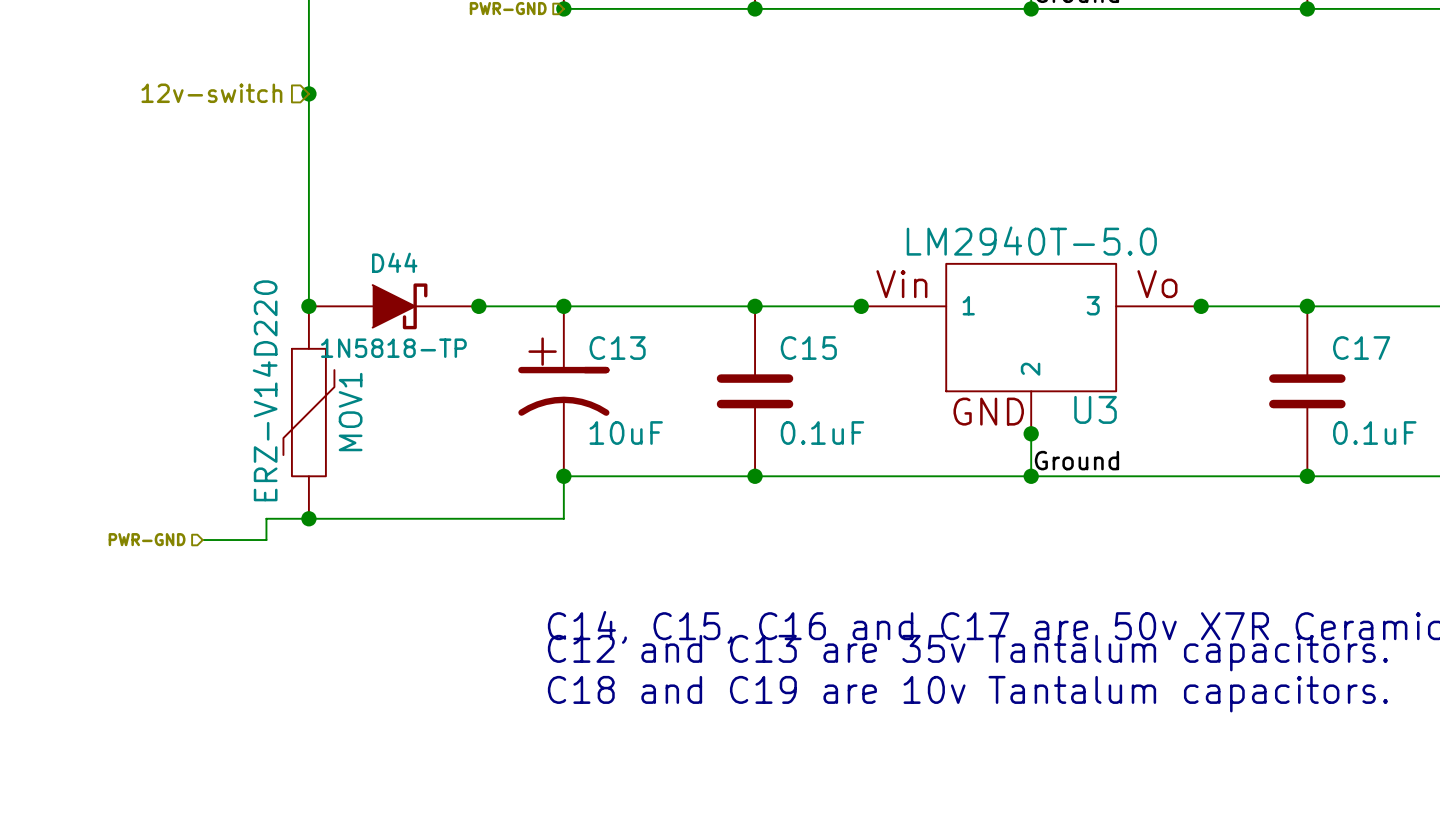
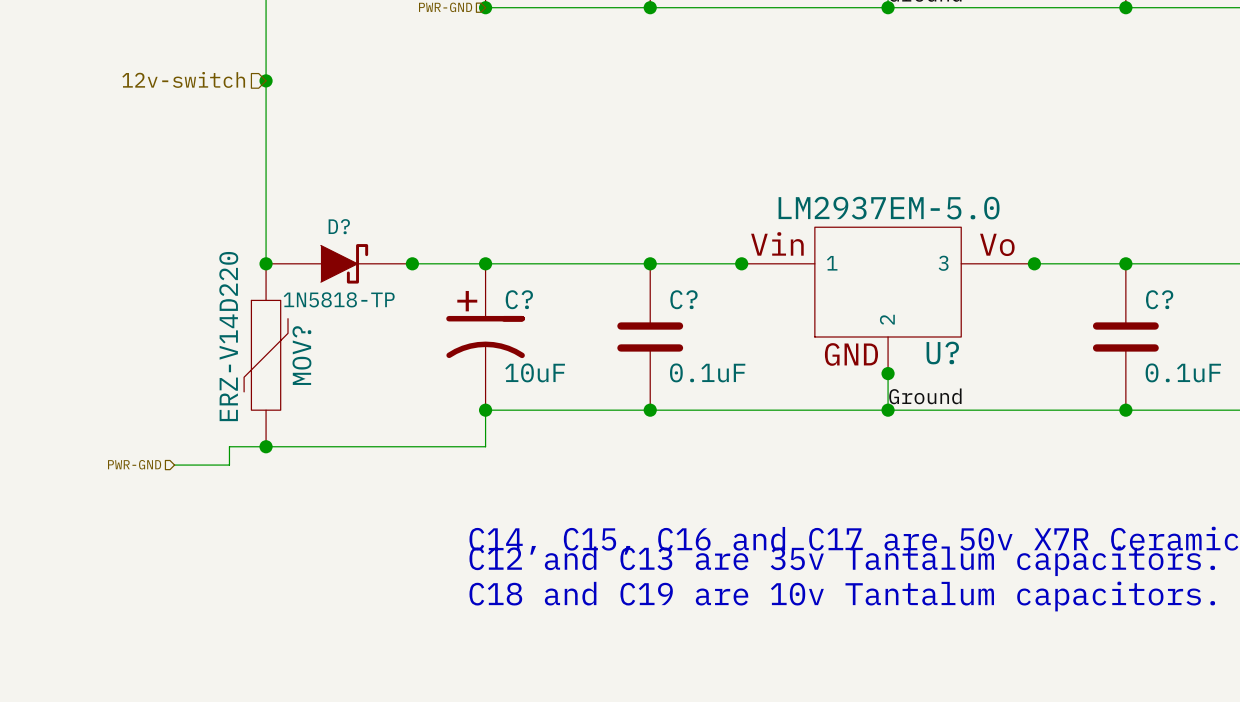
U3 value: LM2940T-5.0 (1031, 241) -> LM2937EM-5.0 (889, 208)
D44 name: D44 (394, 262) -> D? (339, 226)
C13 name: C13 (617, 348) -> C? (519, 299)
C15 name: C15 (808, 348) -> C? (683, 299)
C17 name: C17 (1361, 348) -> C? (1159, 299)
U3 name: U3 (1095, 409) -> U? (942, 353)
MOV1 name: MOV1 (350, 412) -> MOV? (301, 355)

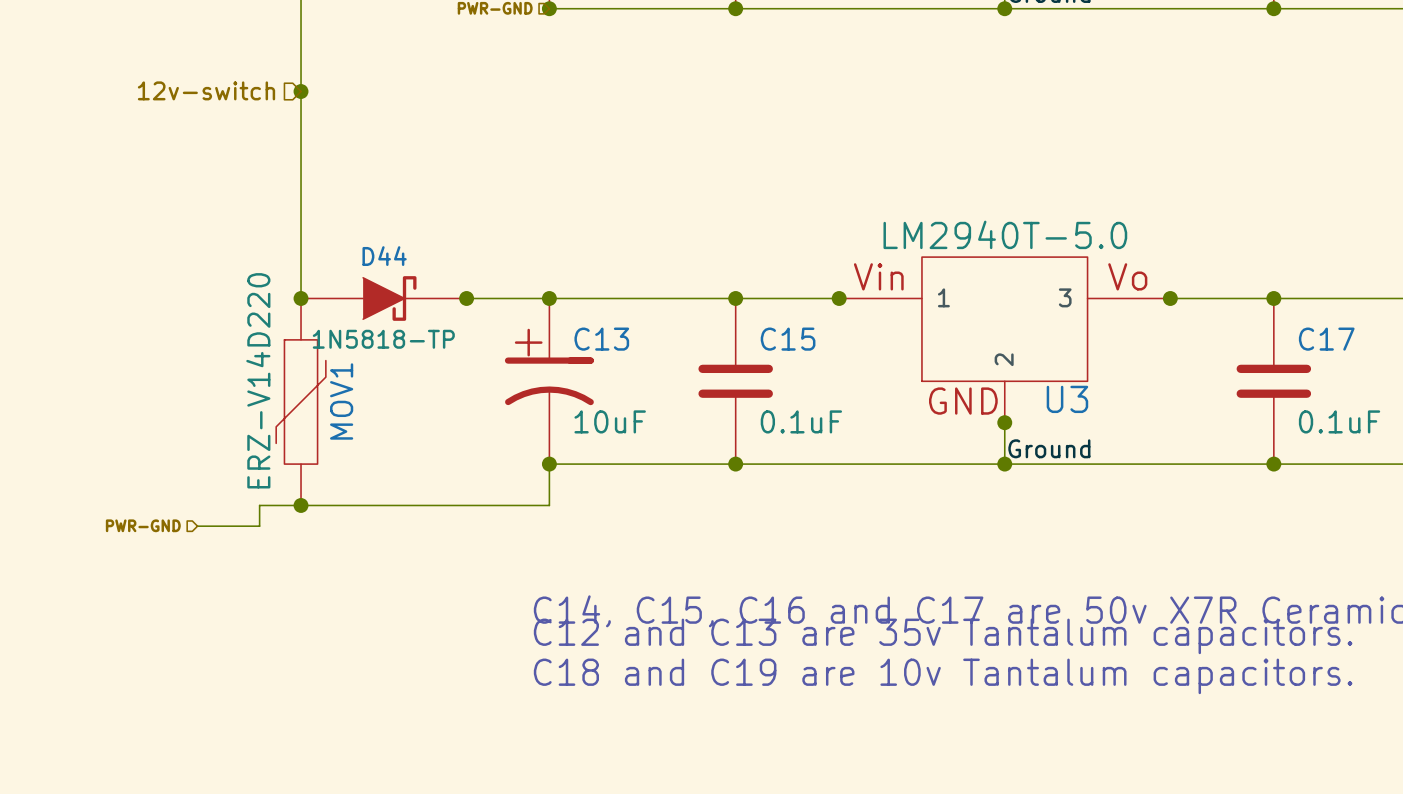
U? value: LM2937EM-5.0 (889, 208) -> LM2940T-5.0 (1005, 234)
D? name: D? (339, 226) -> D44 (384, 256)
C? name: C? (519, 299) -> C13 (601, 339)
C? name: C? (683, 299) -> C15 (788, 339)
C? name: C? (1159, 299) -> C17 (1326, 339)
U? name: U? (942, 353) -> U3 (1067, 399)
MOV? name: MOV? (301, 355) -> MOV1 (341, 401)

